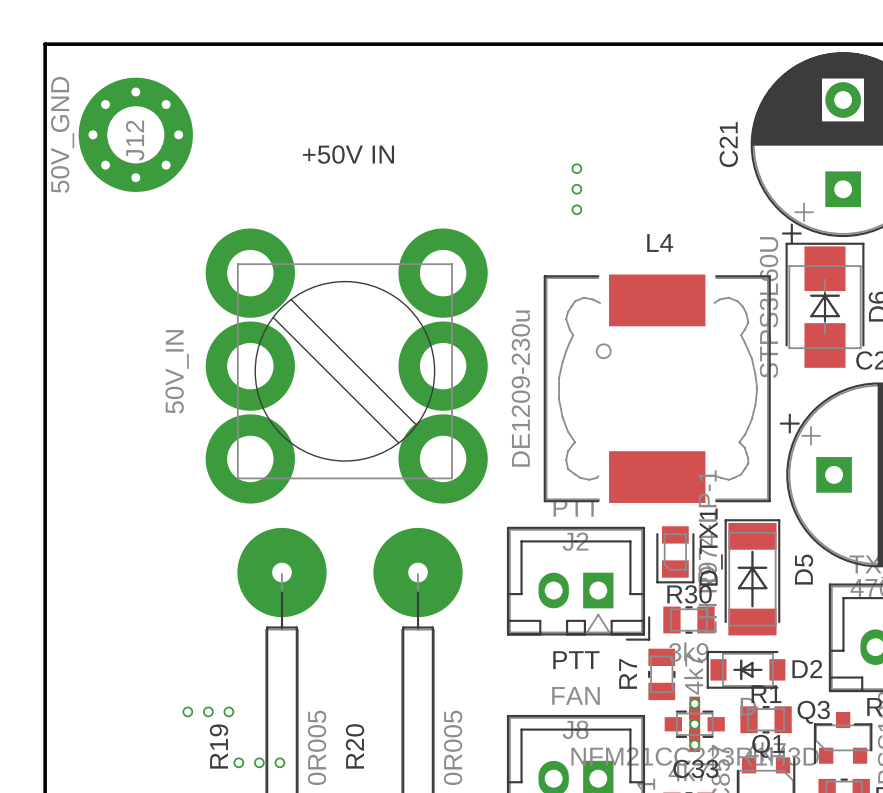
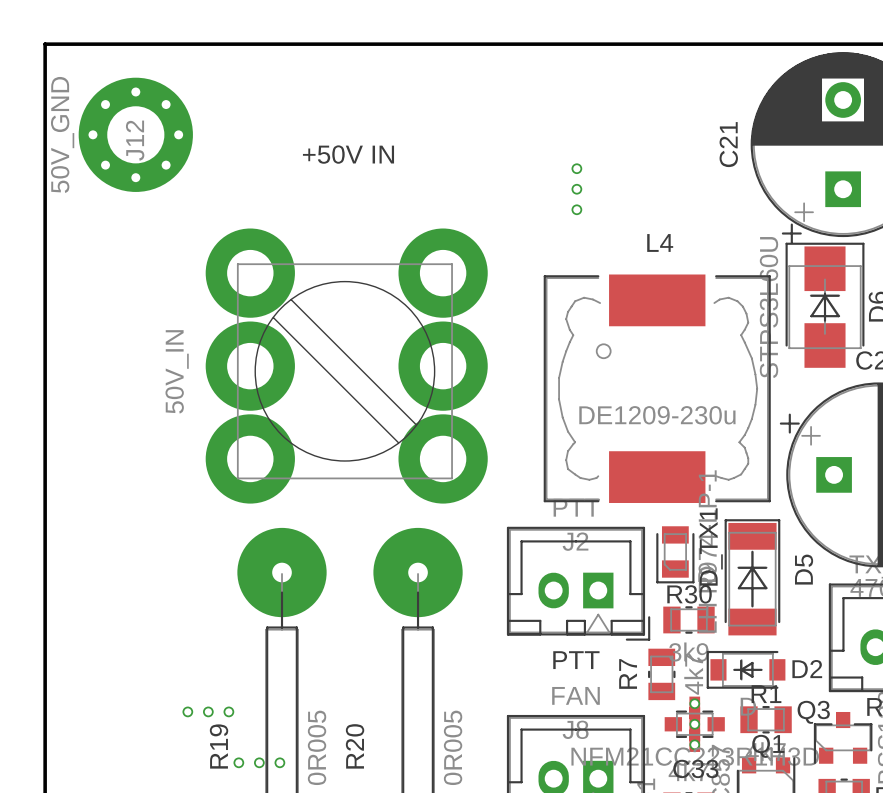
L4 value rotation: 0° (520, 388) -> 90° clockwise (657, 415)

